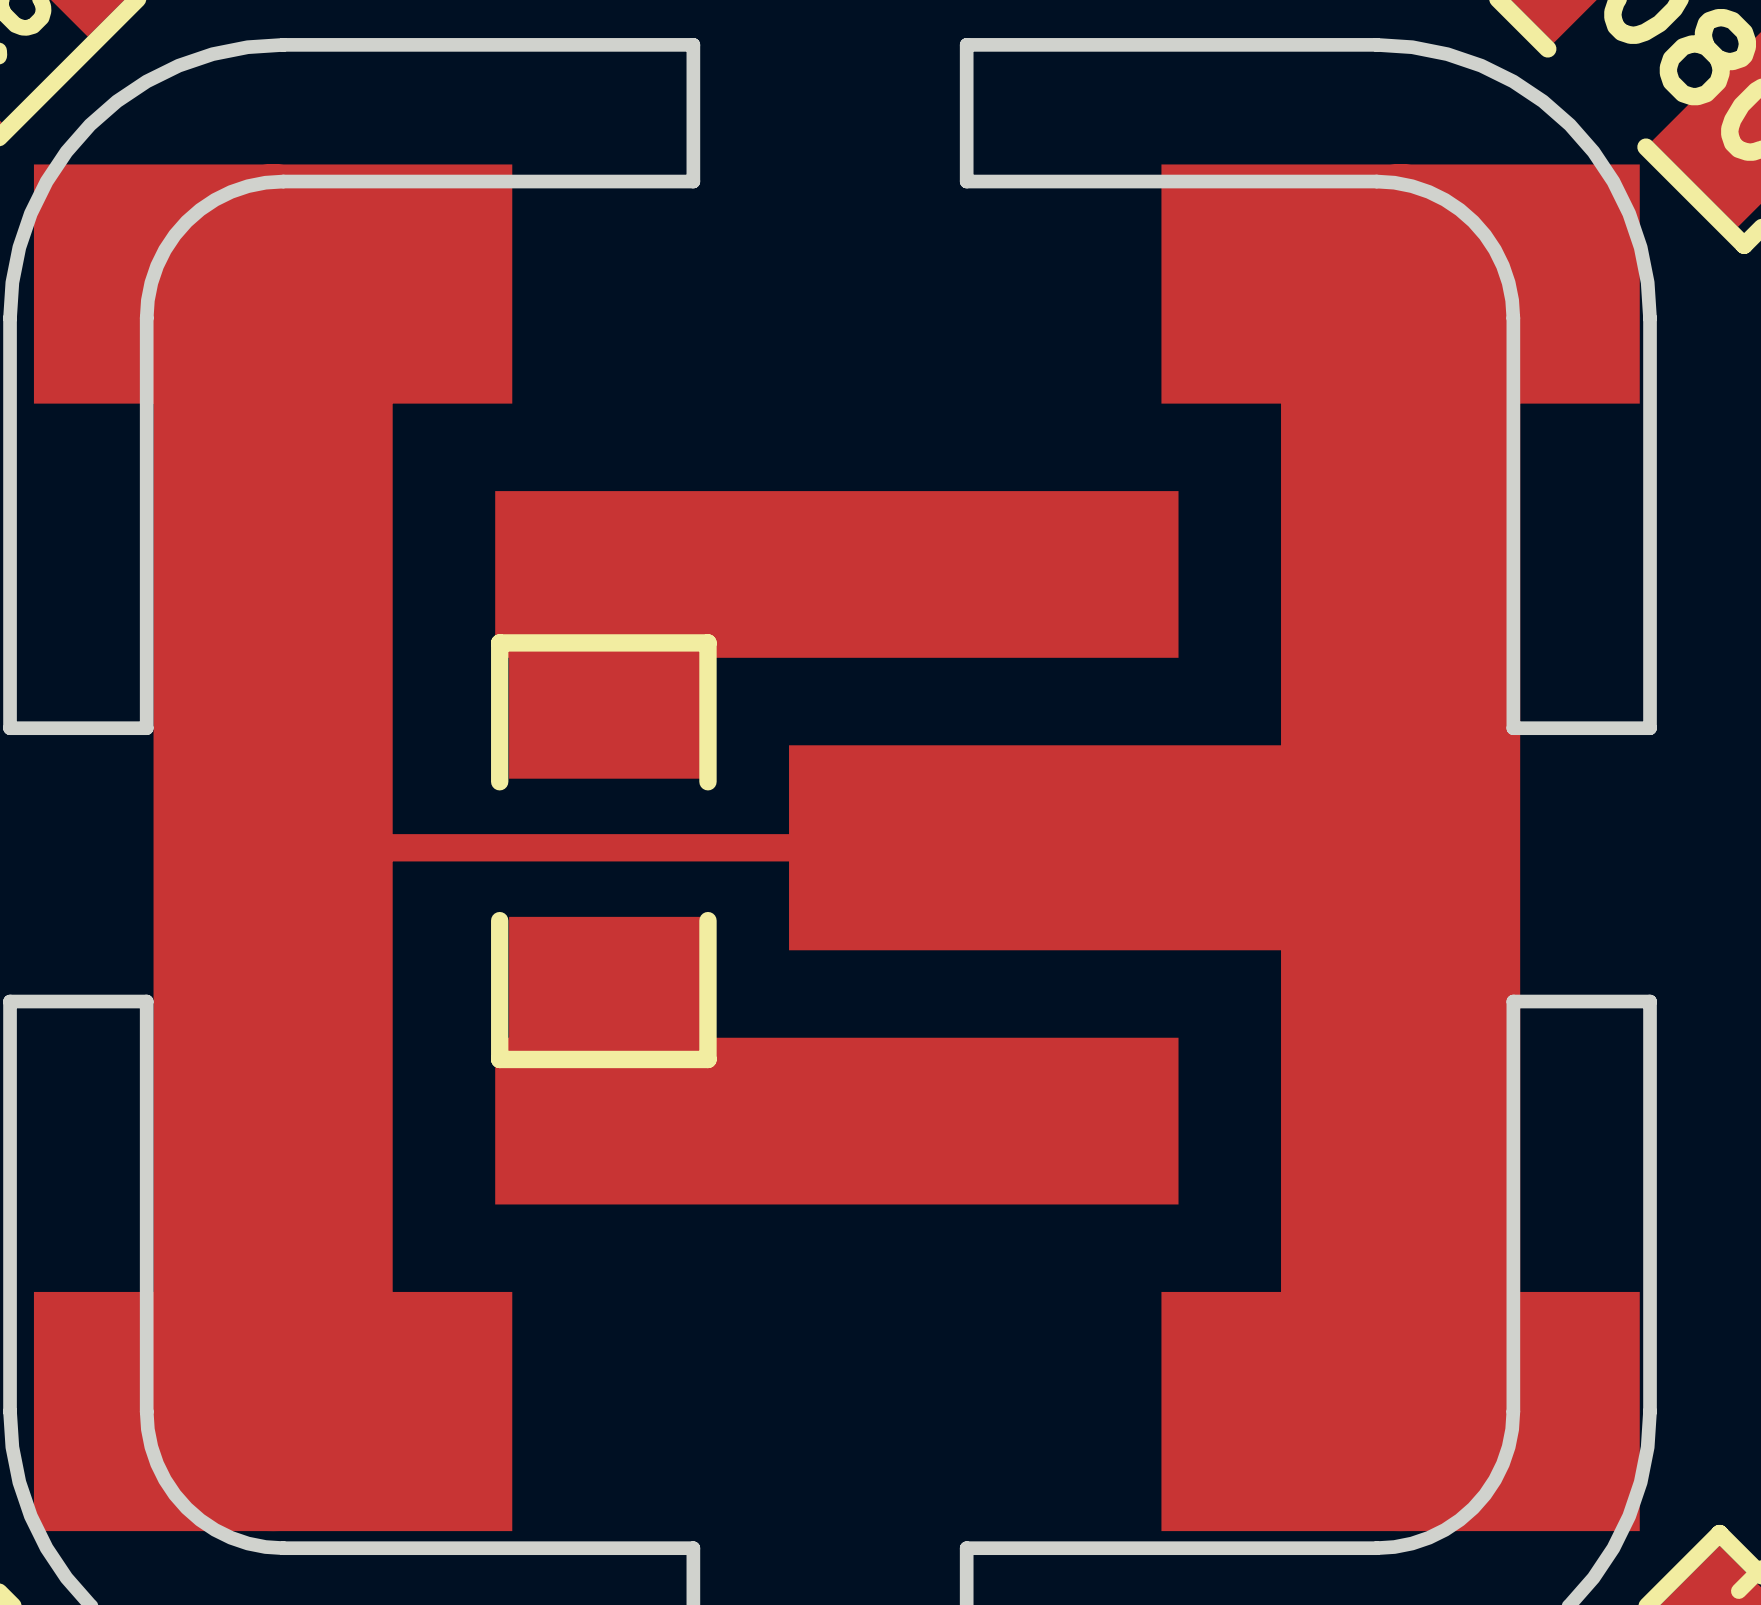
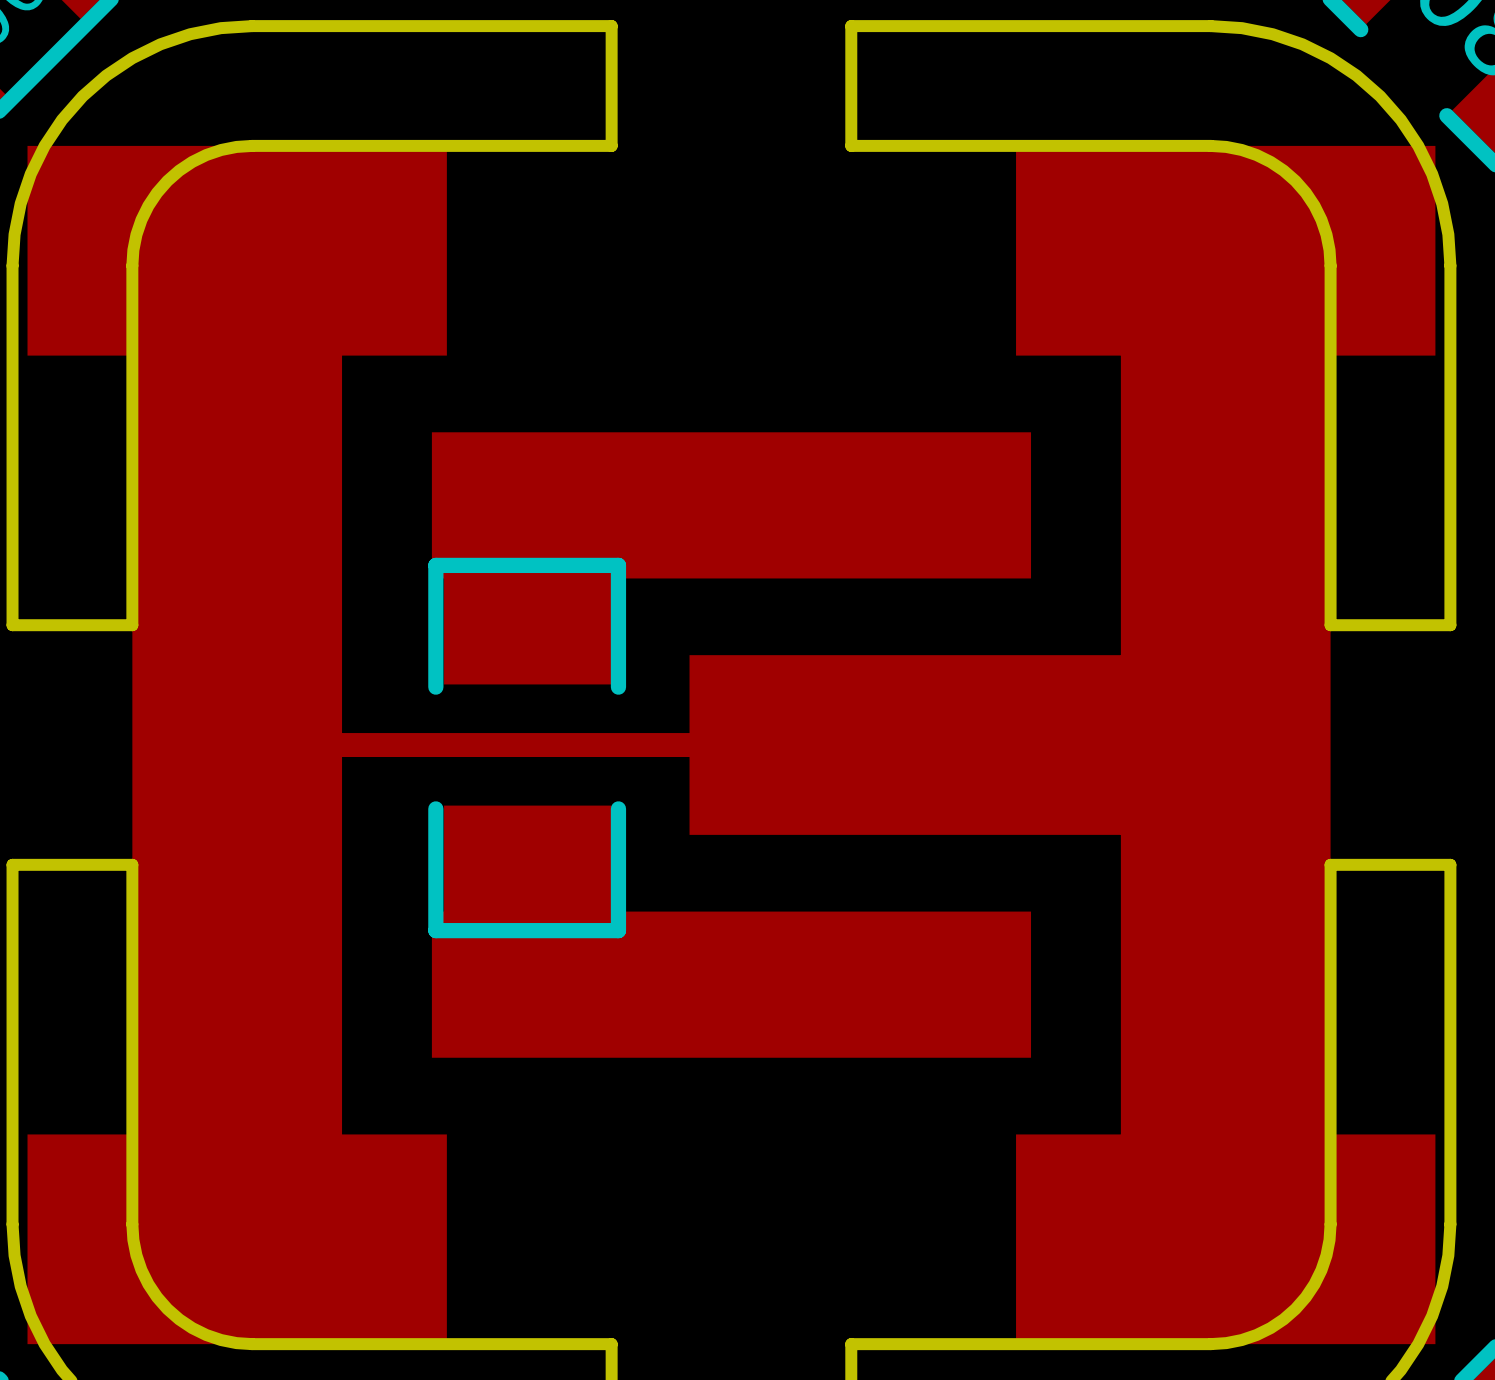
part position: (836, 847) -> (731, 745)

